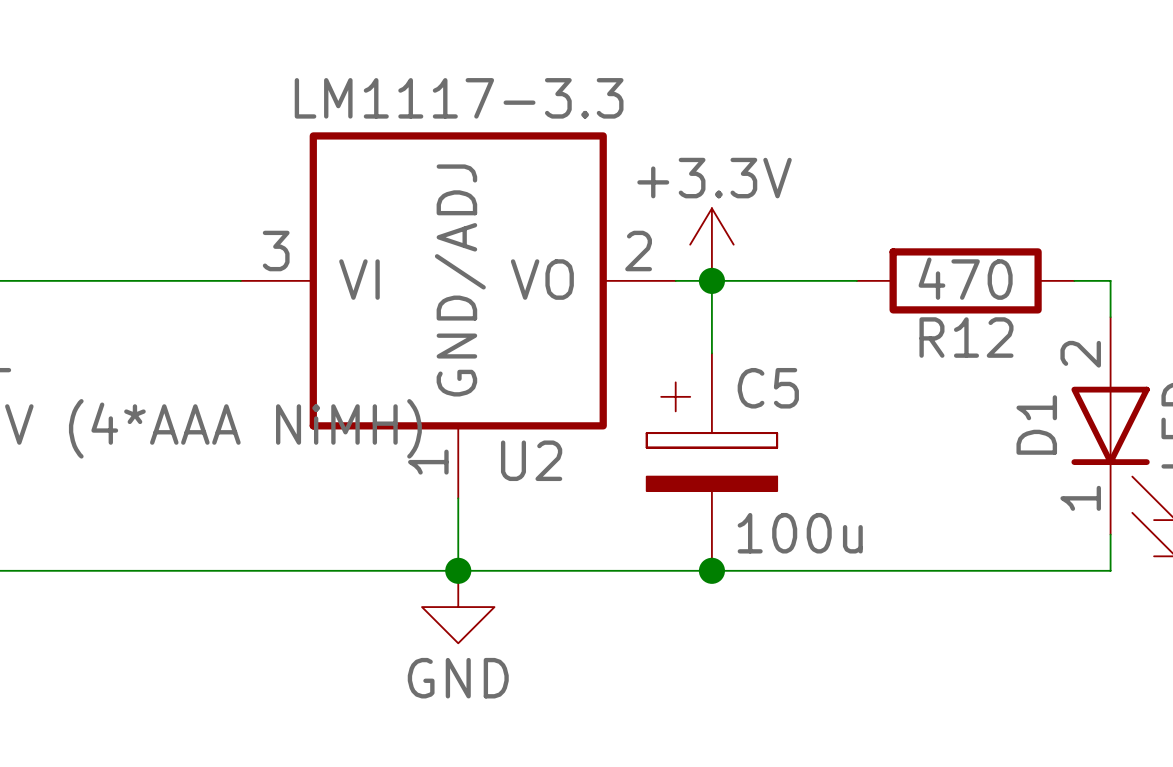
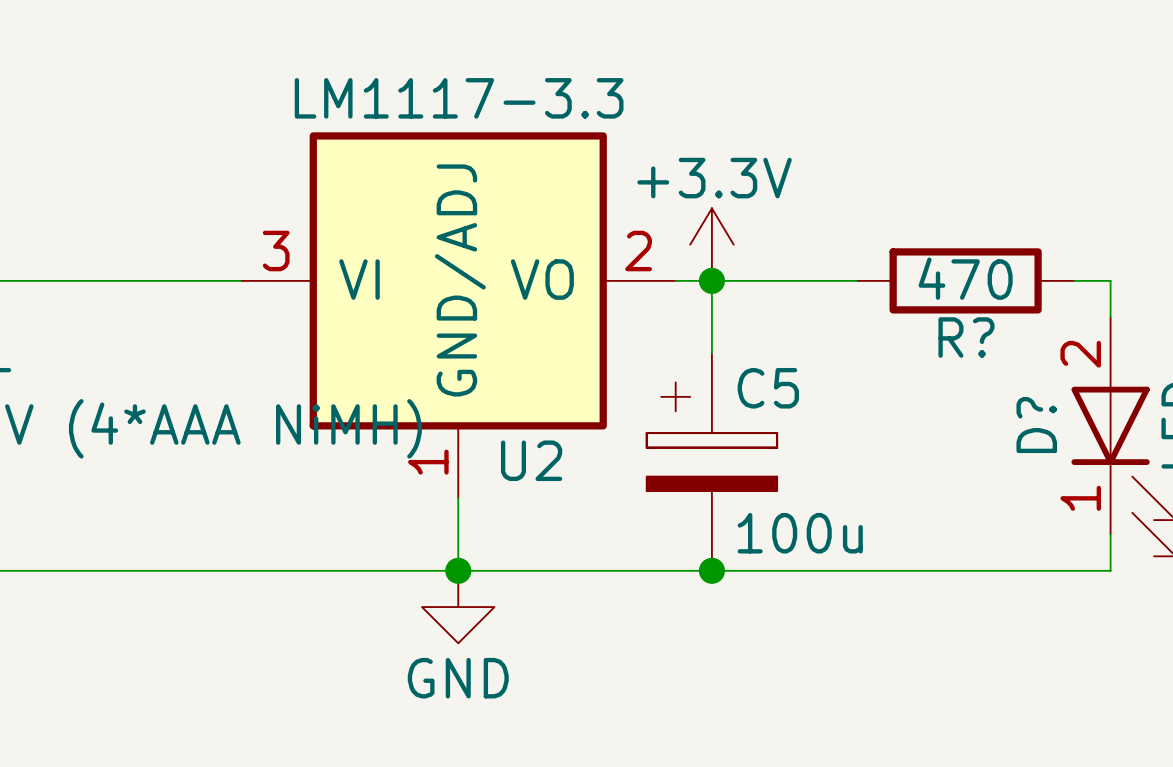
R12 name: R12 (966, 337) -> R? (966, 337)
D1 name: D1 (1036, 425) -> D? (1036, 425)

